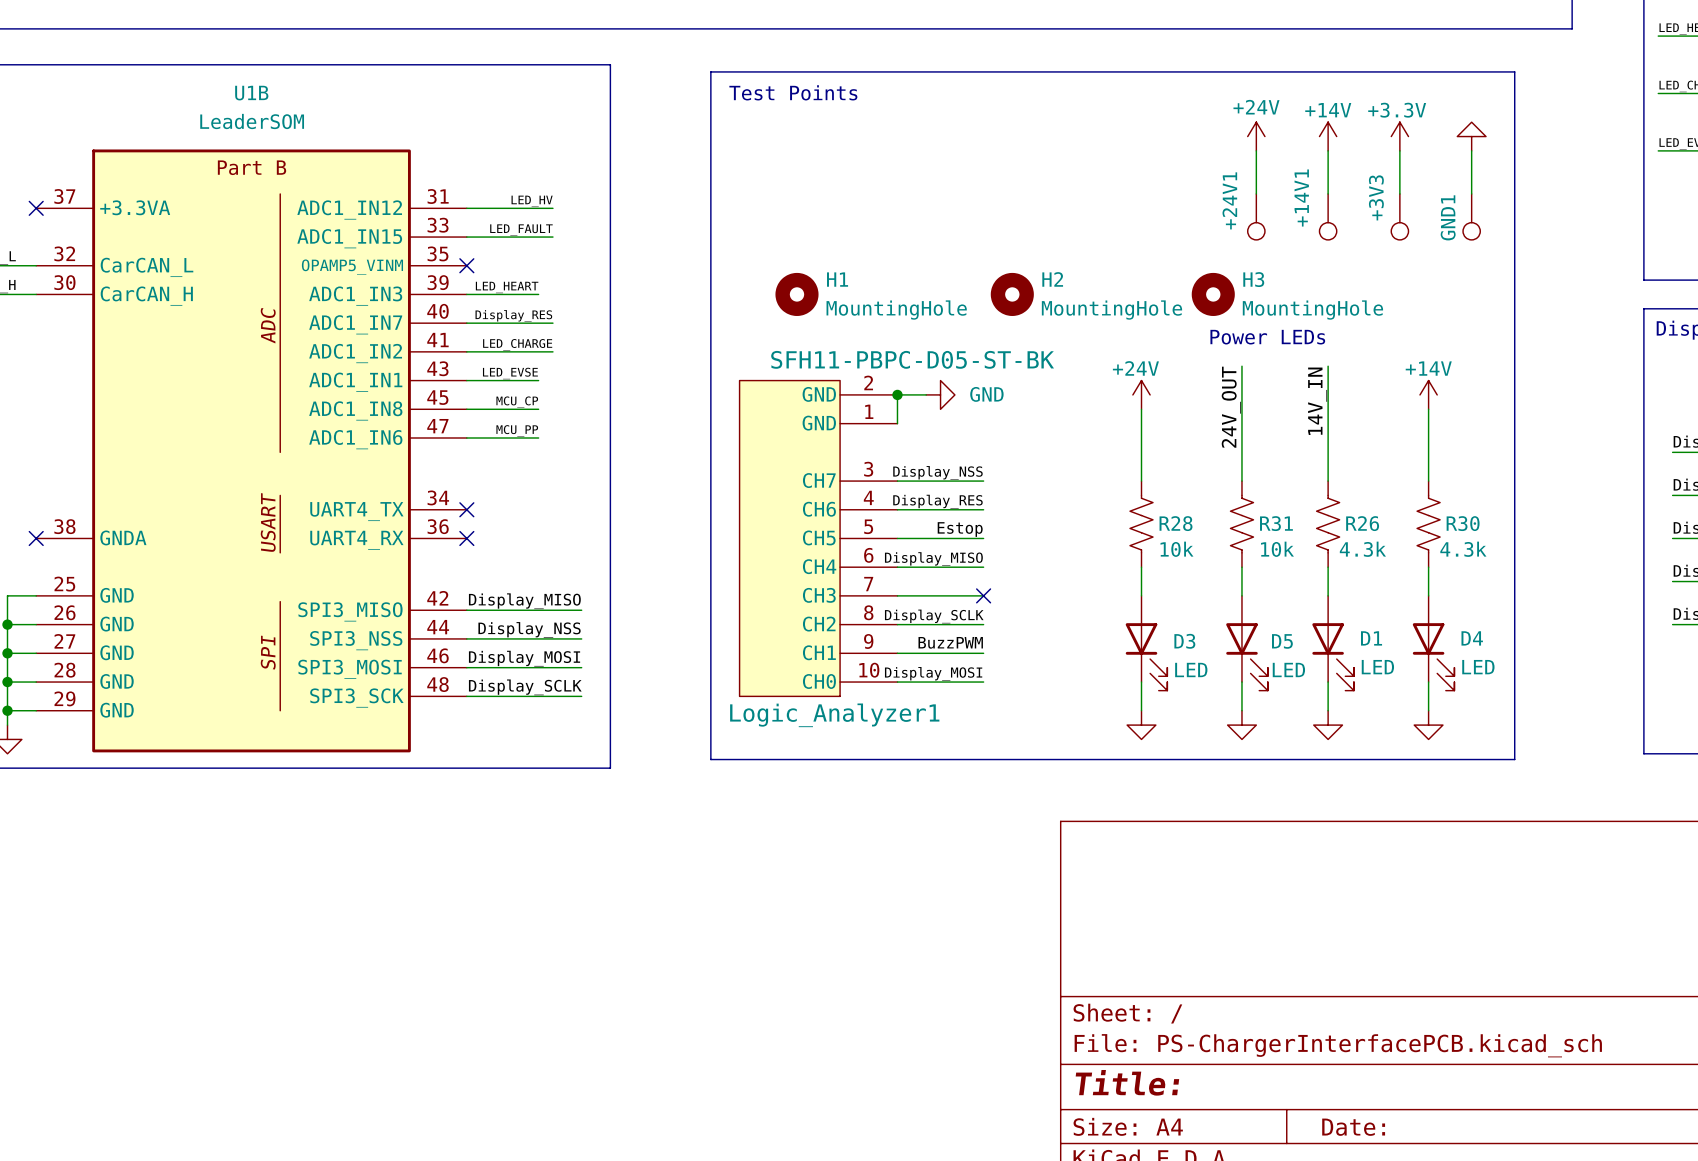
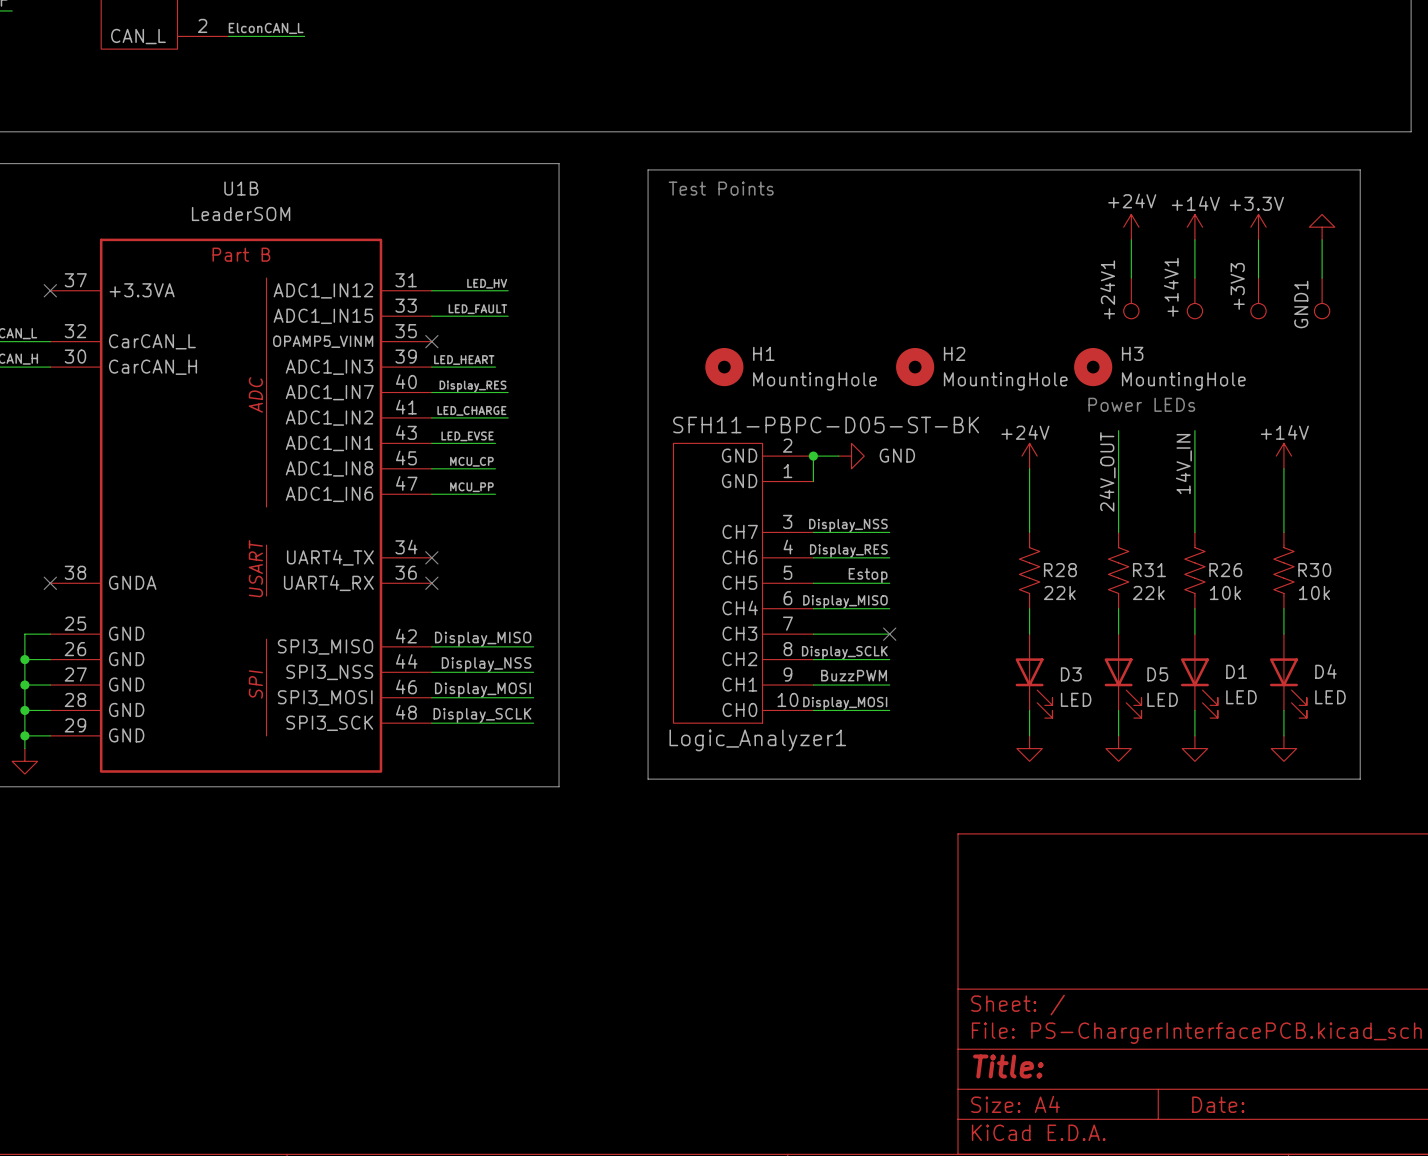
R28 value: 10k (1176, 549) -> 22k (1059, 592)
R31 value: 10k (1277, 549) -> 22k (1148, 592)
R26 value: 4.3k (1362, 549) -> 10k (1225, 592)
R30 value: 4.3k (1463, 549) -> 10k (1314, 592)

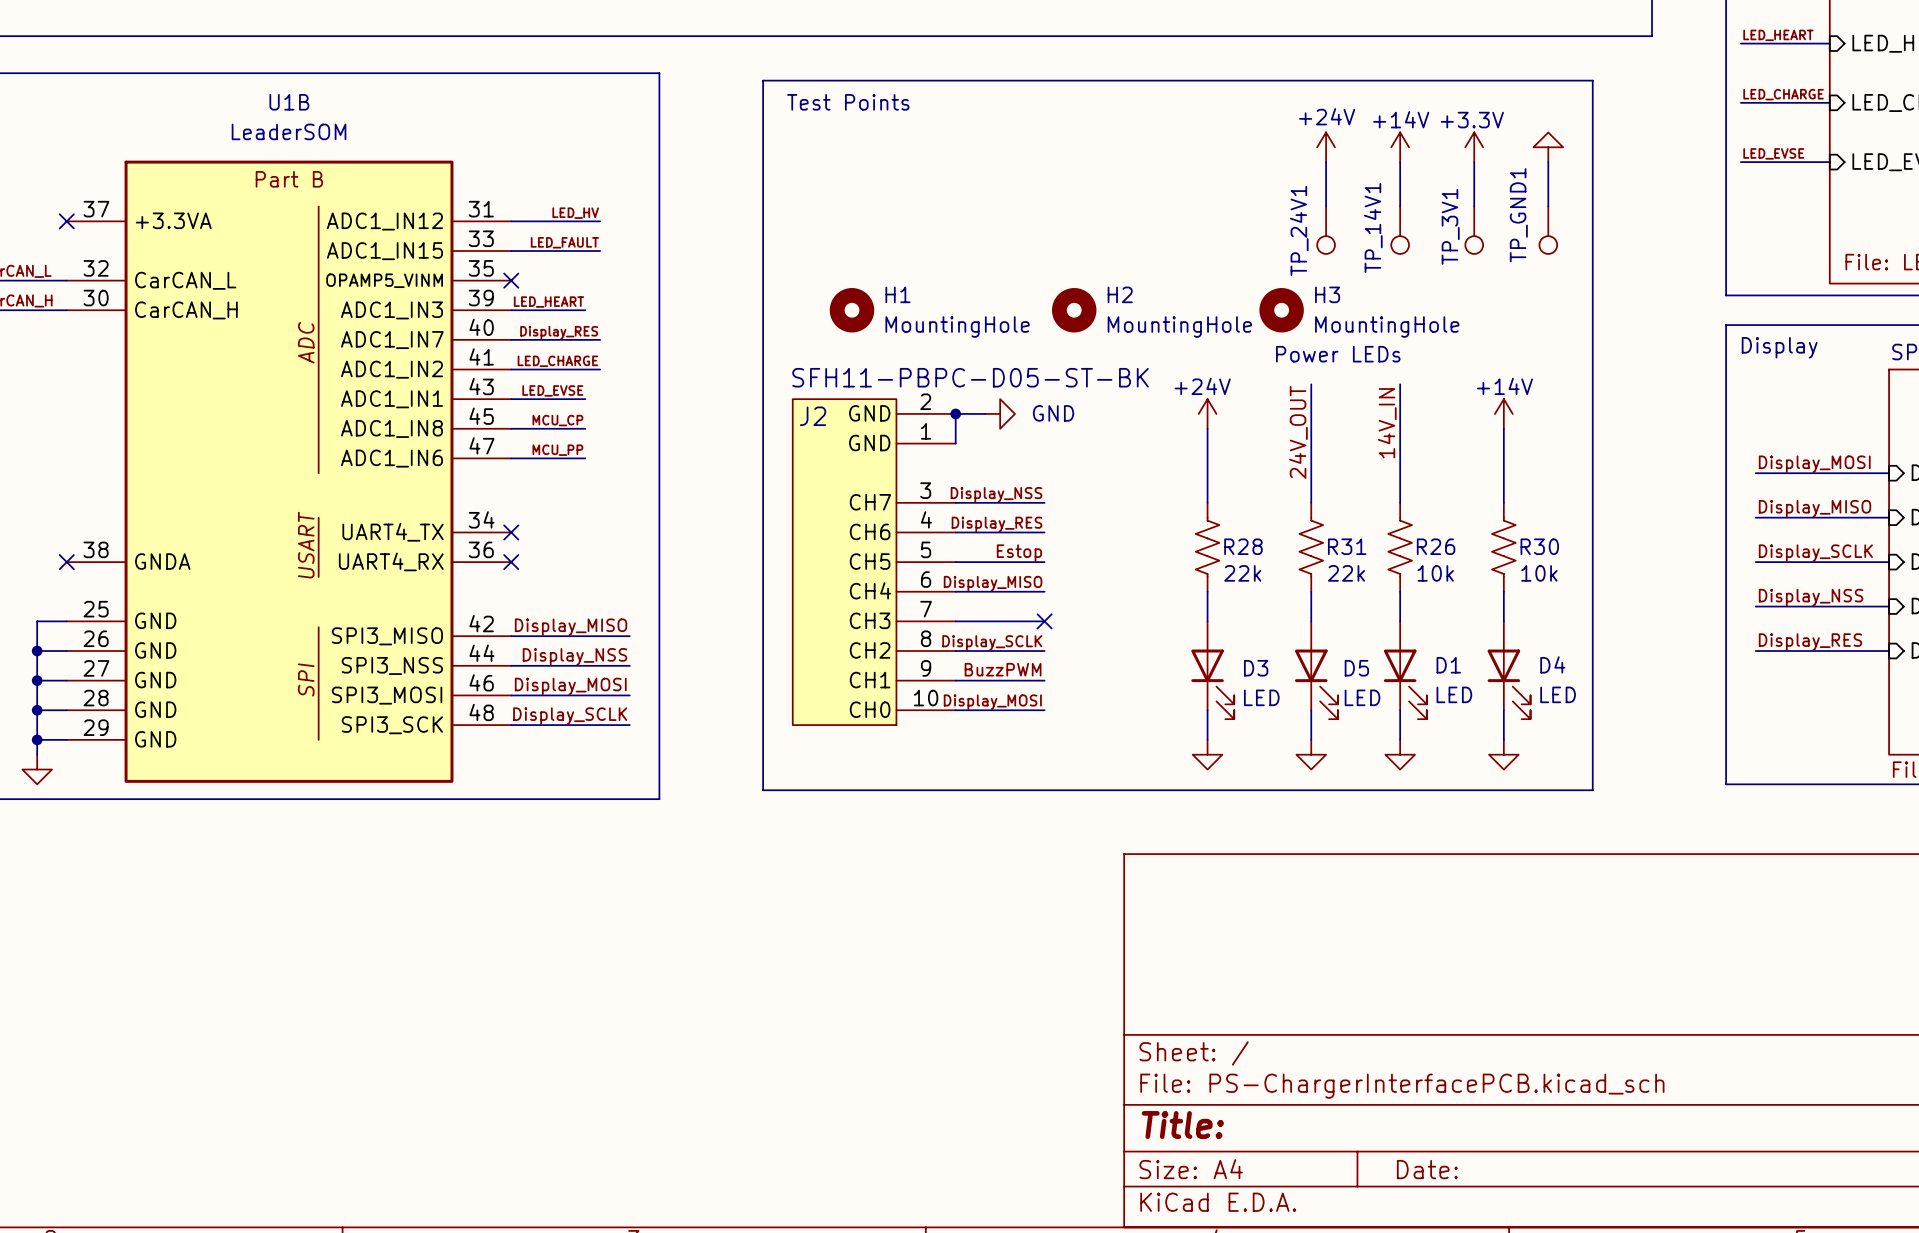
+3V3 name: +3V3 (1237, 286) -> TP_3V1 (1450, 226)
+14V1 name: +14V1 (1171, 287) -> TP_14V1 (1373, 227)
+24V1 name: +24V1 (1107, 289) -> TP_24V1 (1299, 230)
GND1 name: GND1 (1301, 304) -> TP_GND1 (1518, 215)
Logic_Analyzer1 name: Logic_Analyzer1 (757, 740) -> J2 (813, 416)

